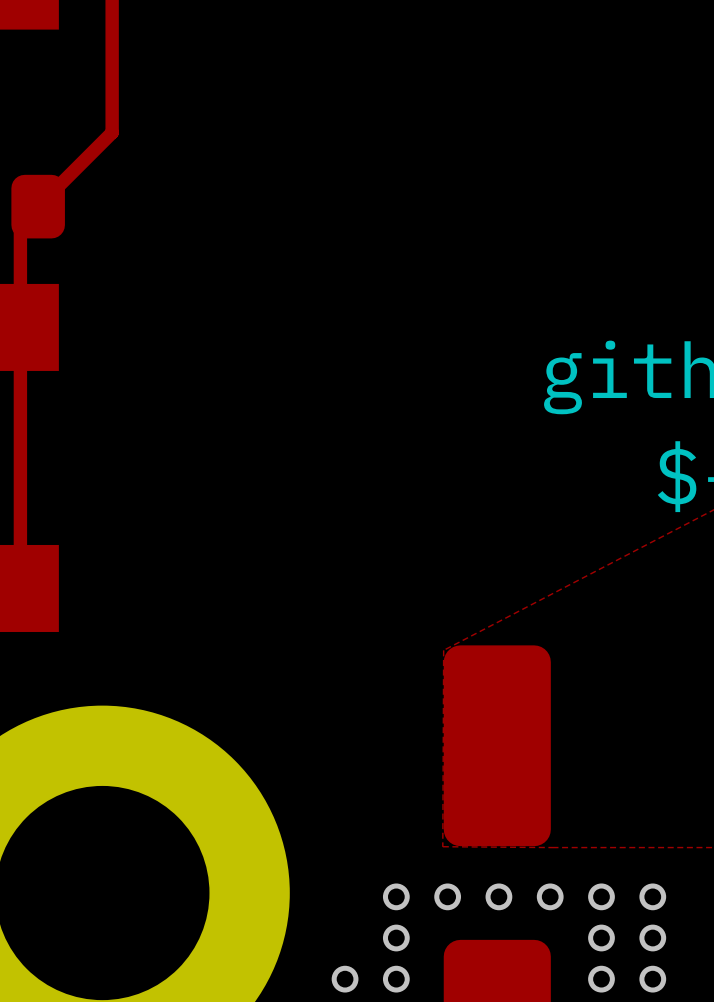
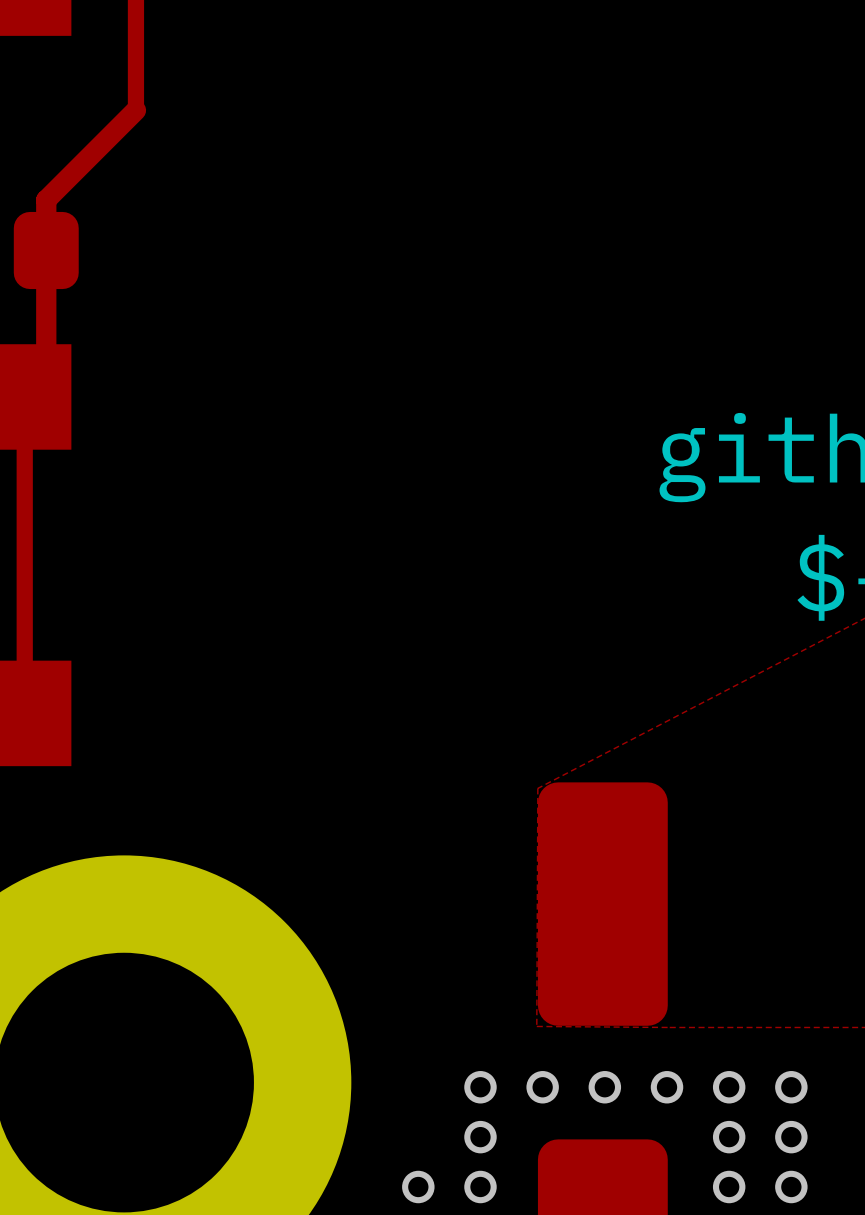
top track: (112, 91) (112, 132) (38, 206) -> (135, 110) (46, 200) (46, 375) (24, 396)
top track: (20, 224) (20, 327) -> none

